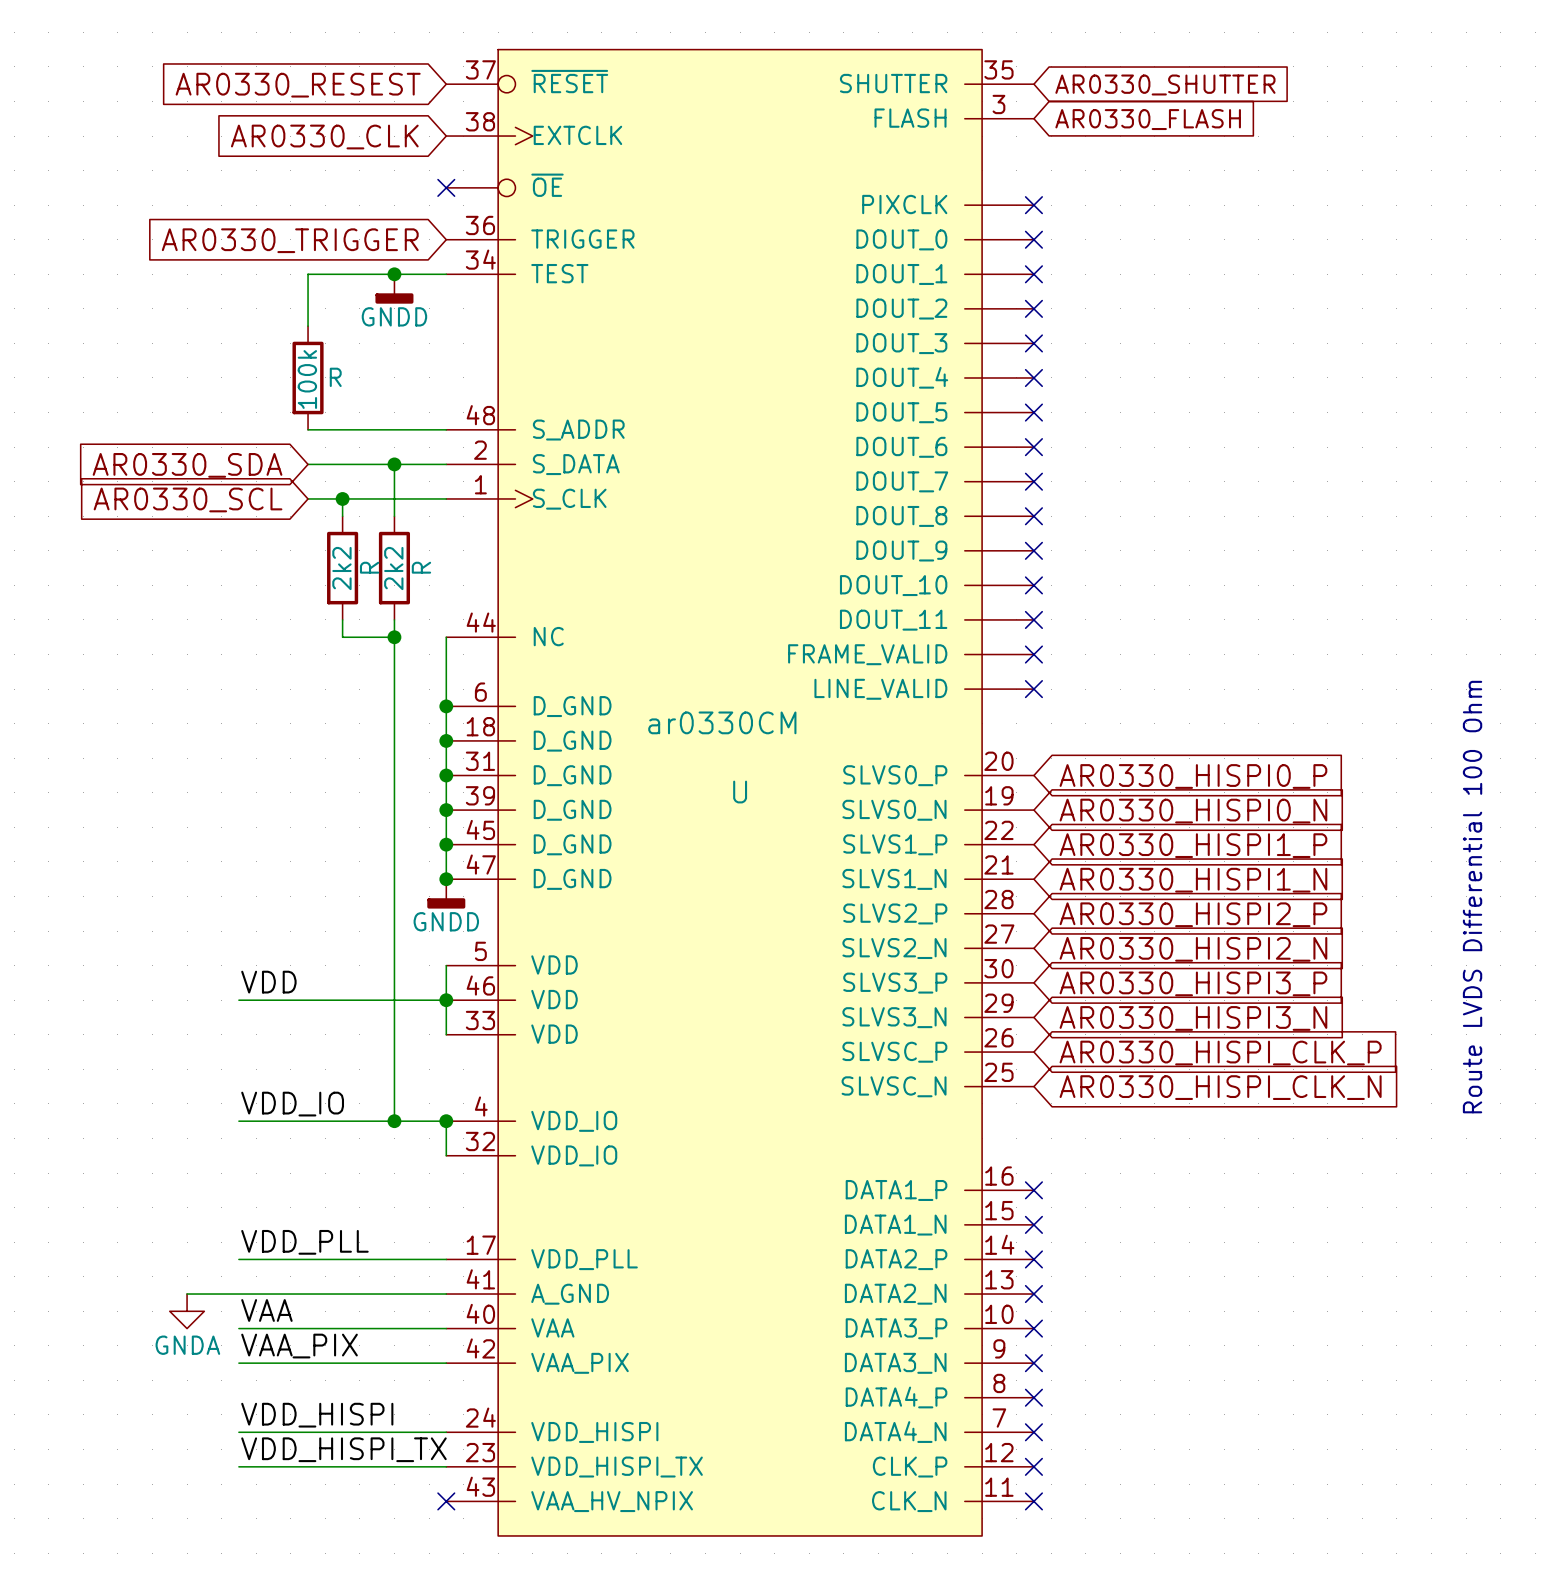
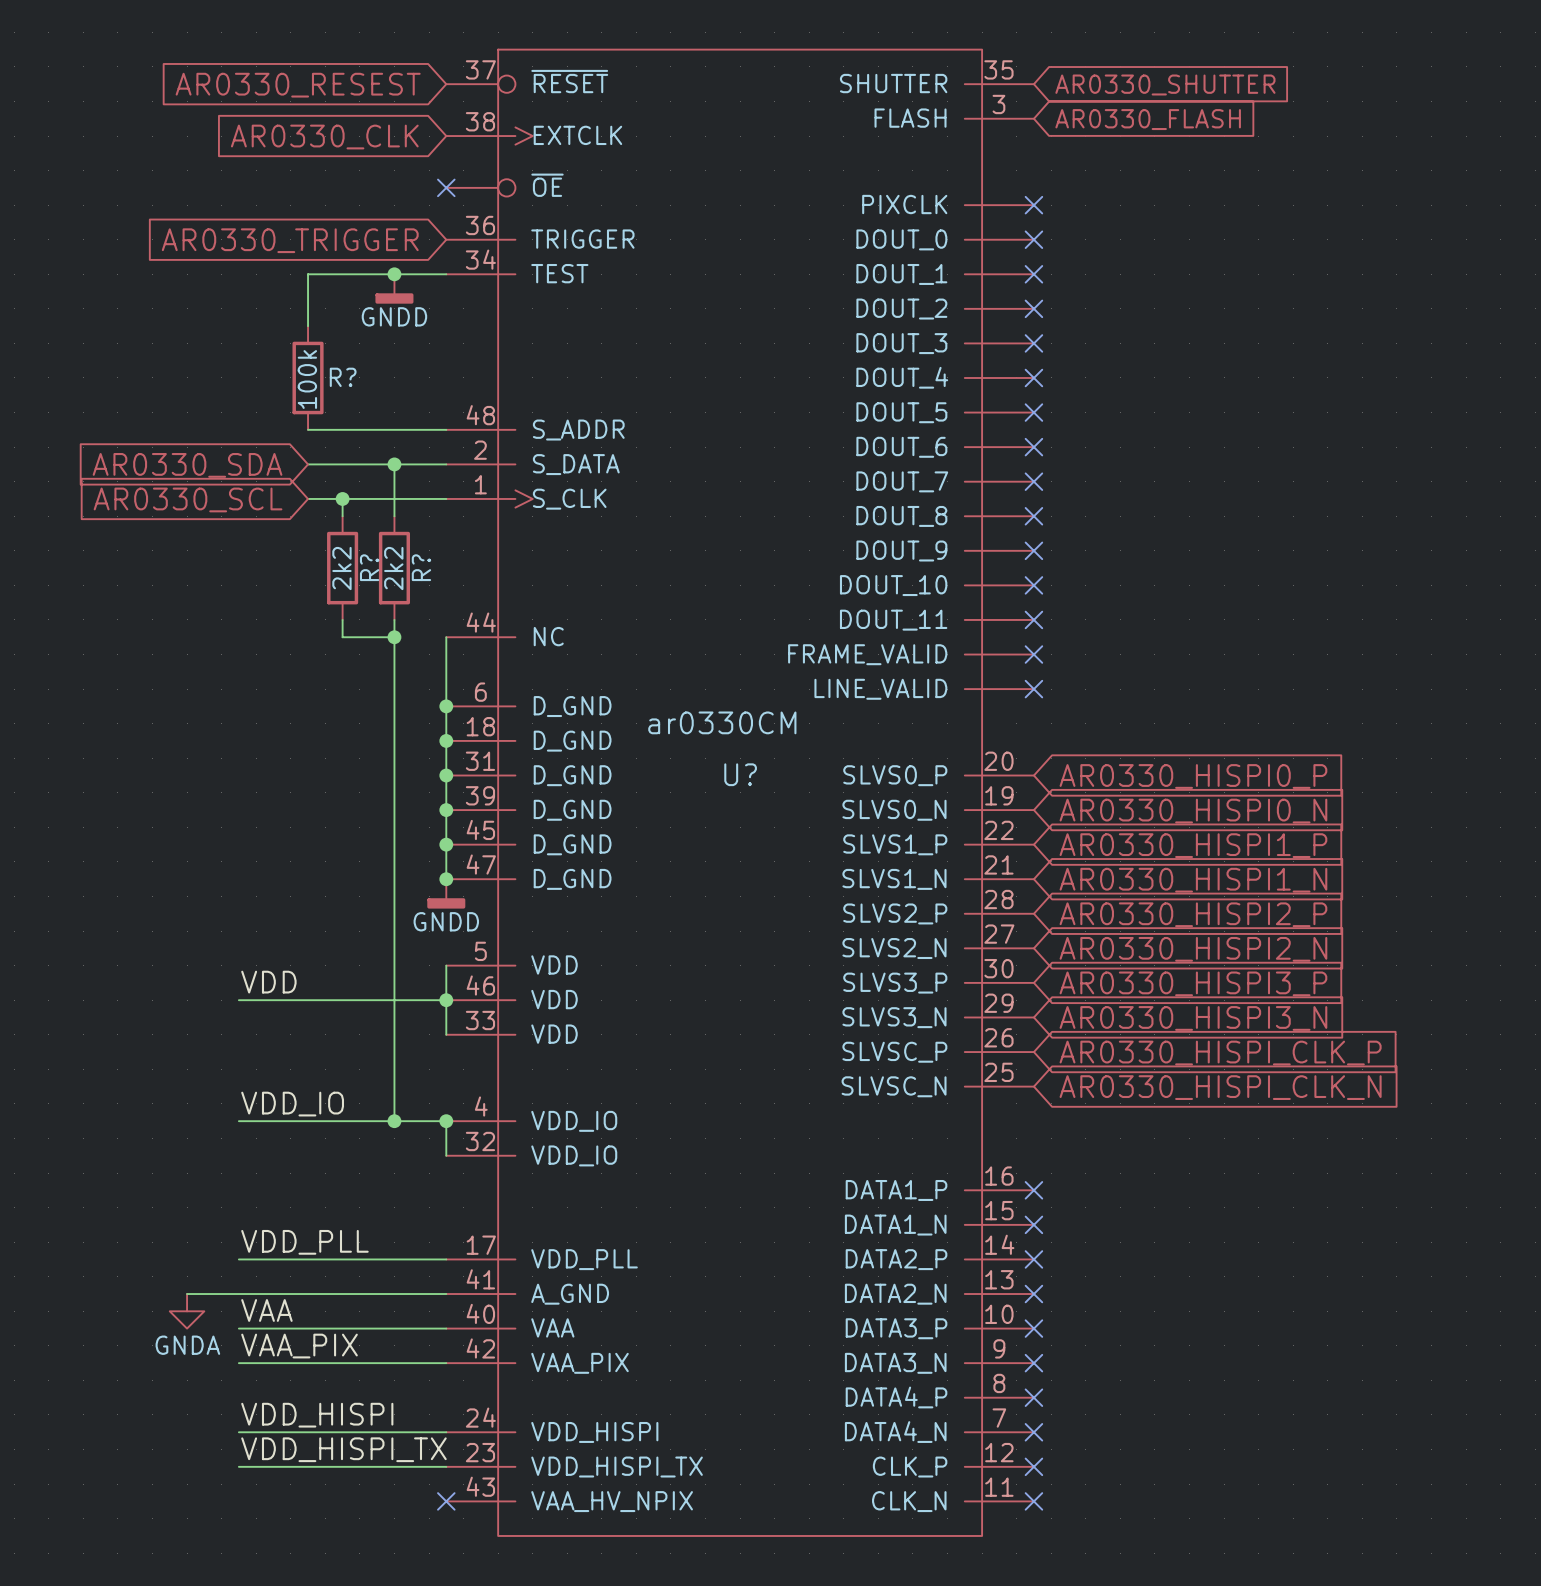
R name: R (335, 377) -> R? (343, 377)
R name: R (369, 567) -> R? (369, 567)
R name: R (421, 567) -> R? (421, 567)
U: ar0330CM (740, 792) -> none
U?: none -> ar0330CM (740, 792)
text: Route LVDS Differential 100 Ohm (1472, 897) -> none

